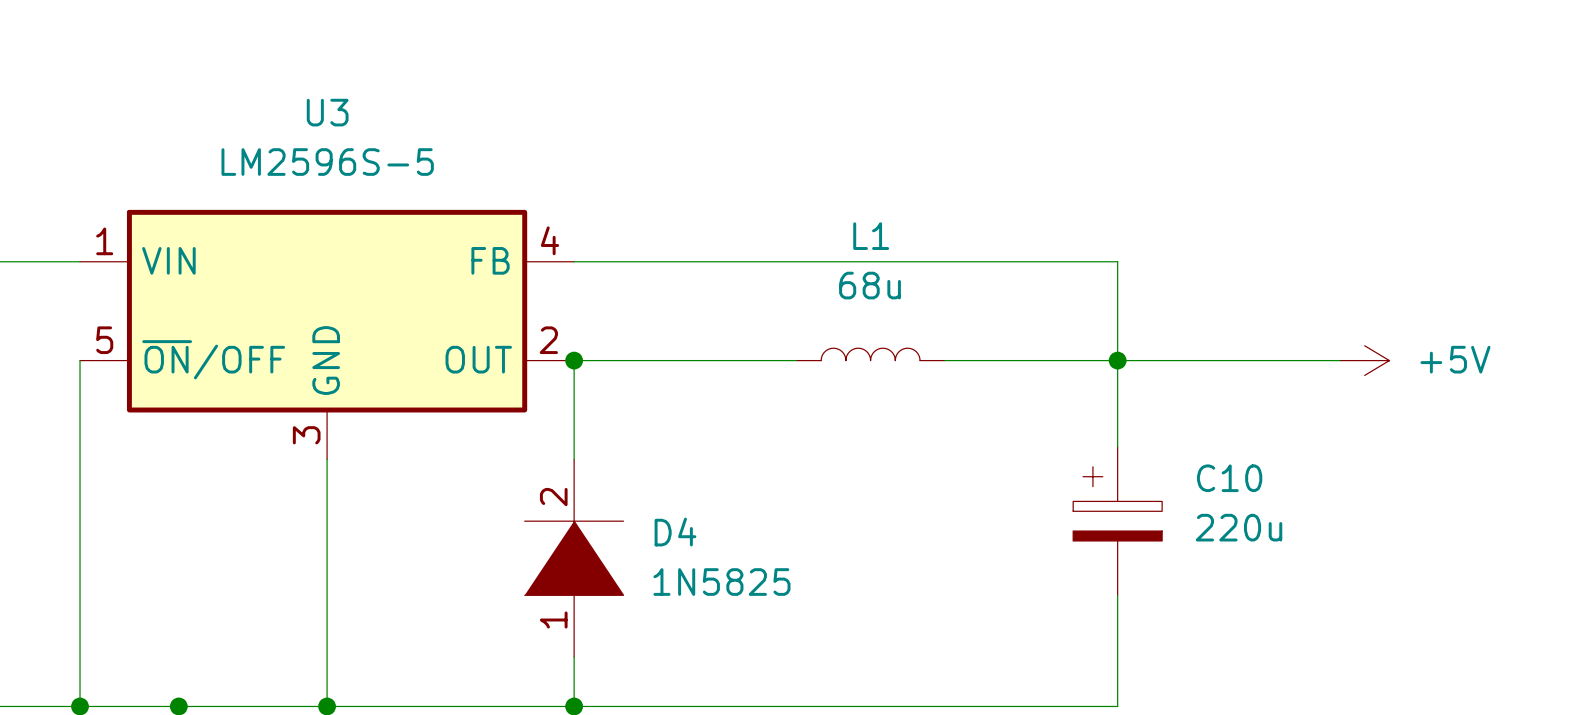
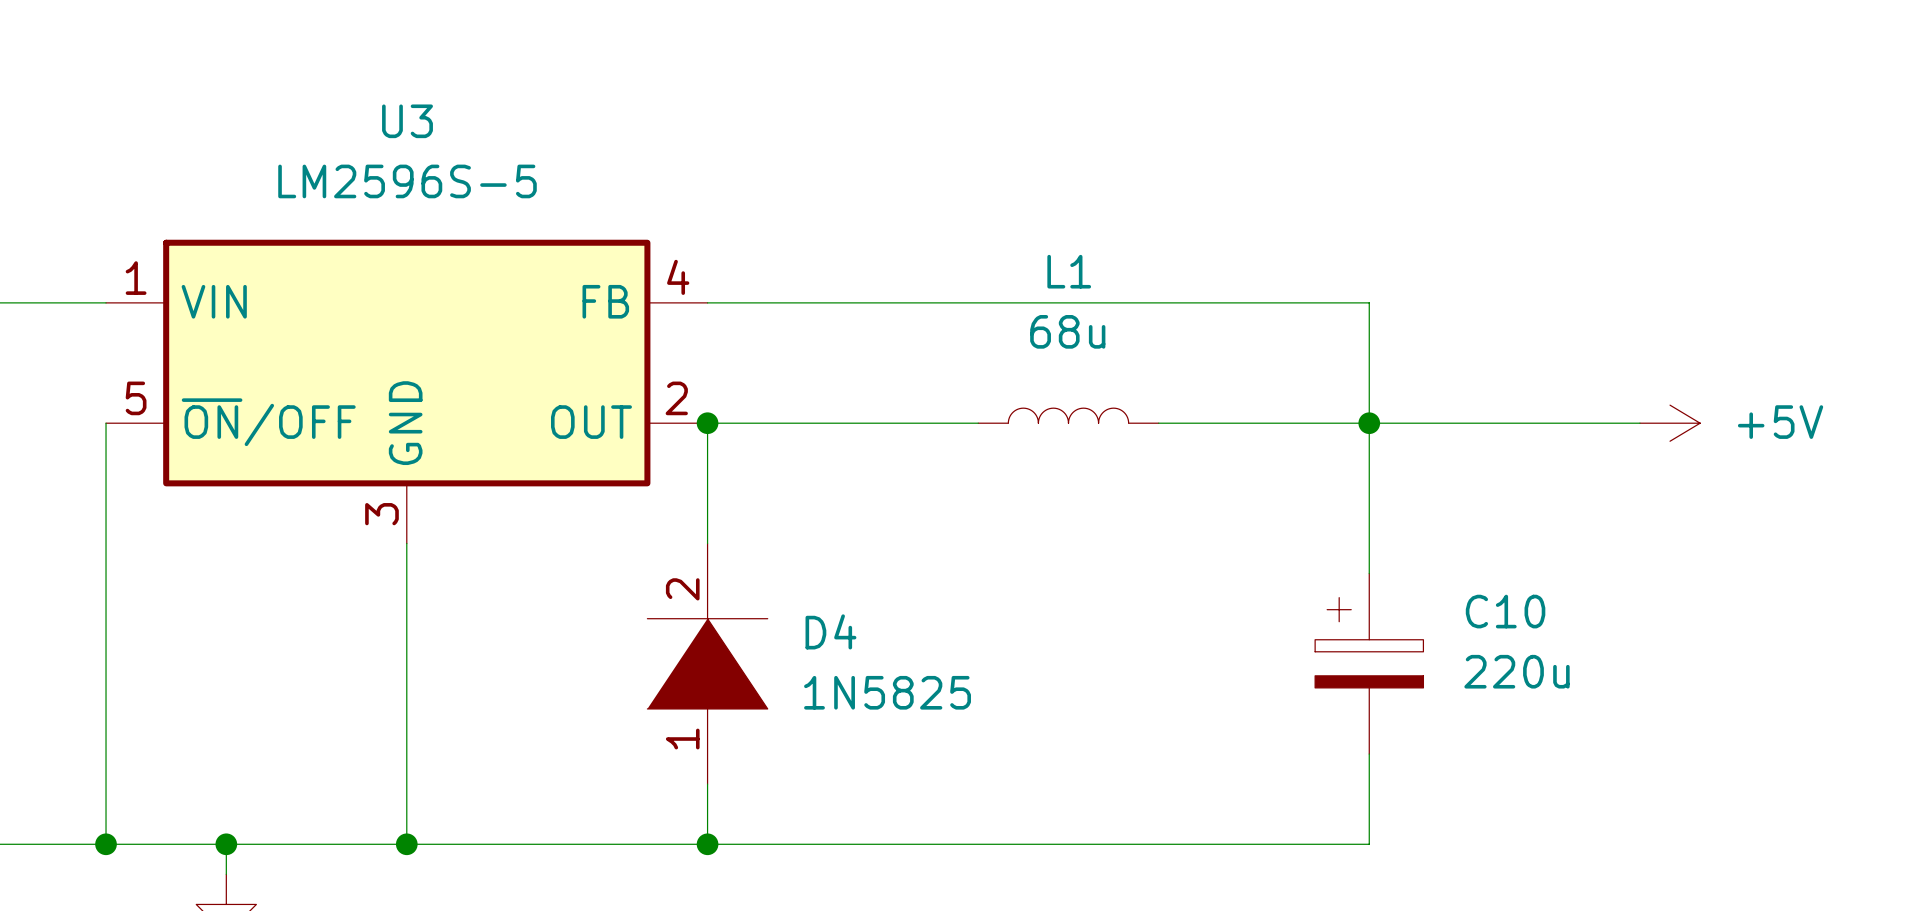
C10 position: (1117, 521) -> (1369, 663)

